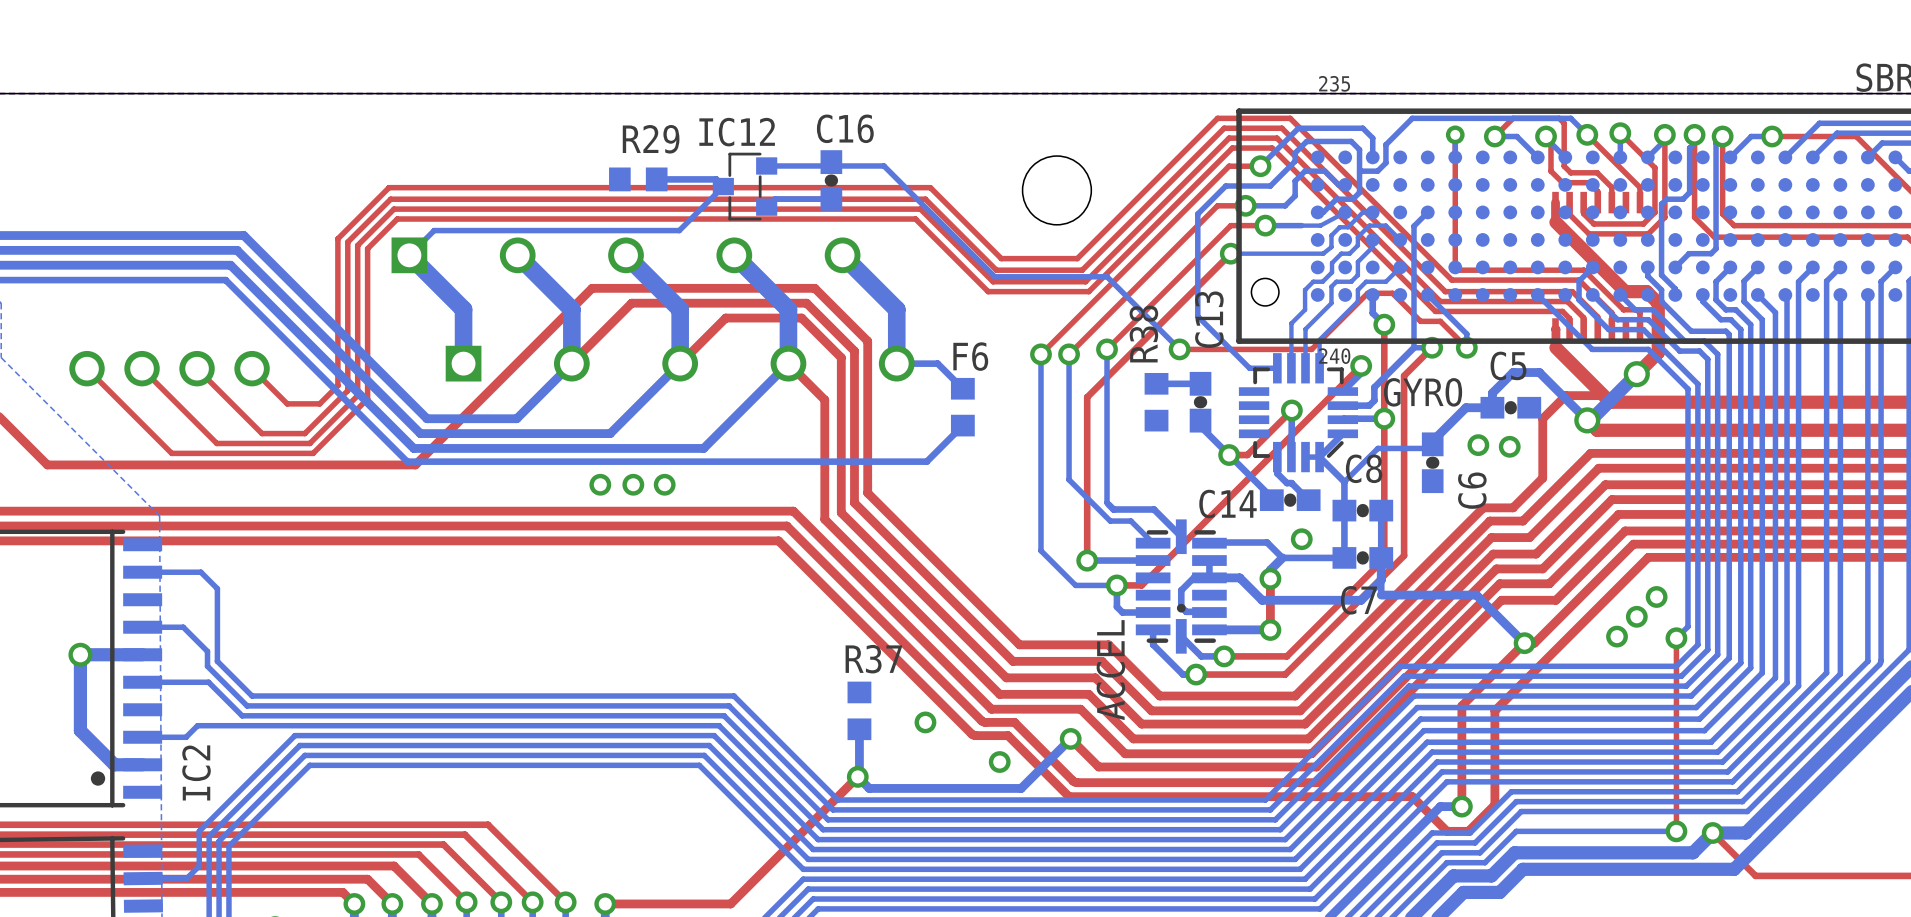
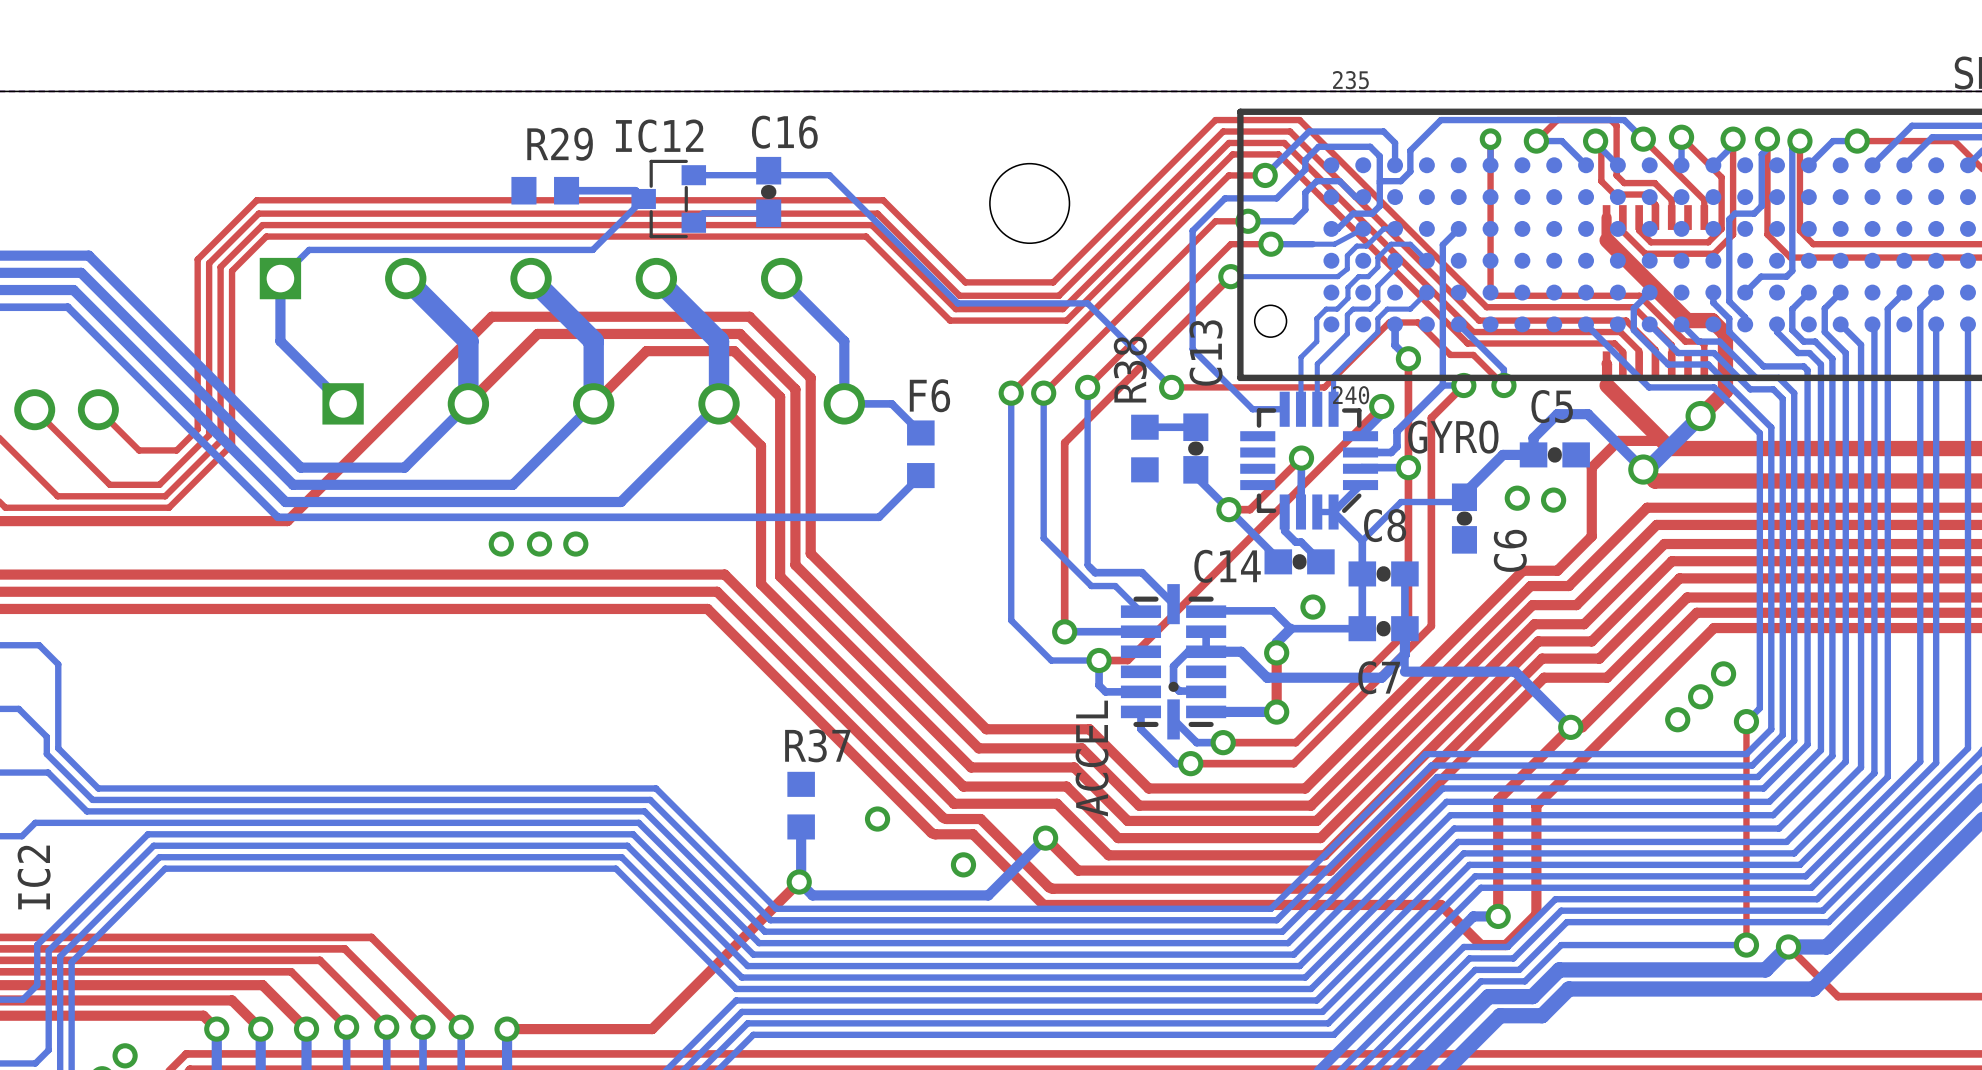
bottom track: (409, 255) (463, 309) (463, 363) -> (280, 278) (280, 341) (343, 403)
bottom track width: thick (842, 255) (896, 309) (896, 363) -> thin (781, 278) (844, 341) (844, 403)

